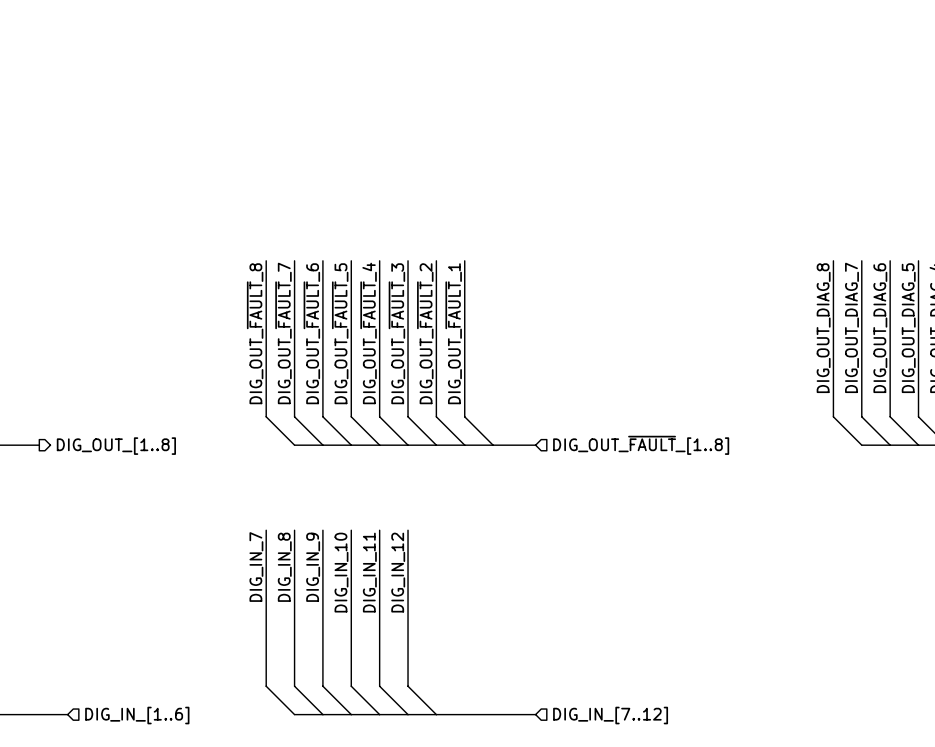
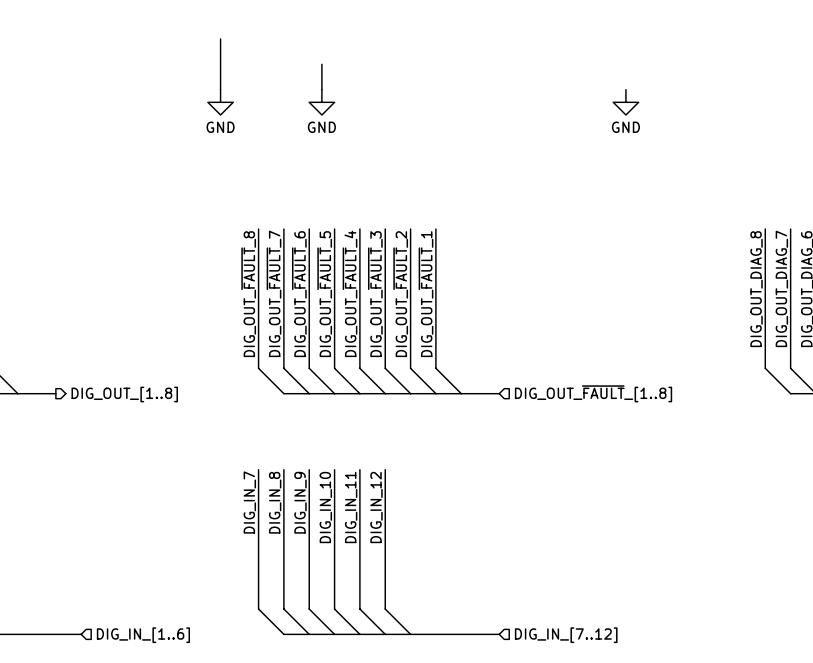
wire: none -> (220, 38) (220, 89)
wire: none -> (321, 64) (321, 89)
power symbol: none -> GND (220, 102)
power symbol: none -> GND (321, 102)
power symbol: none -> GND (625, 102)

